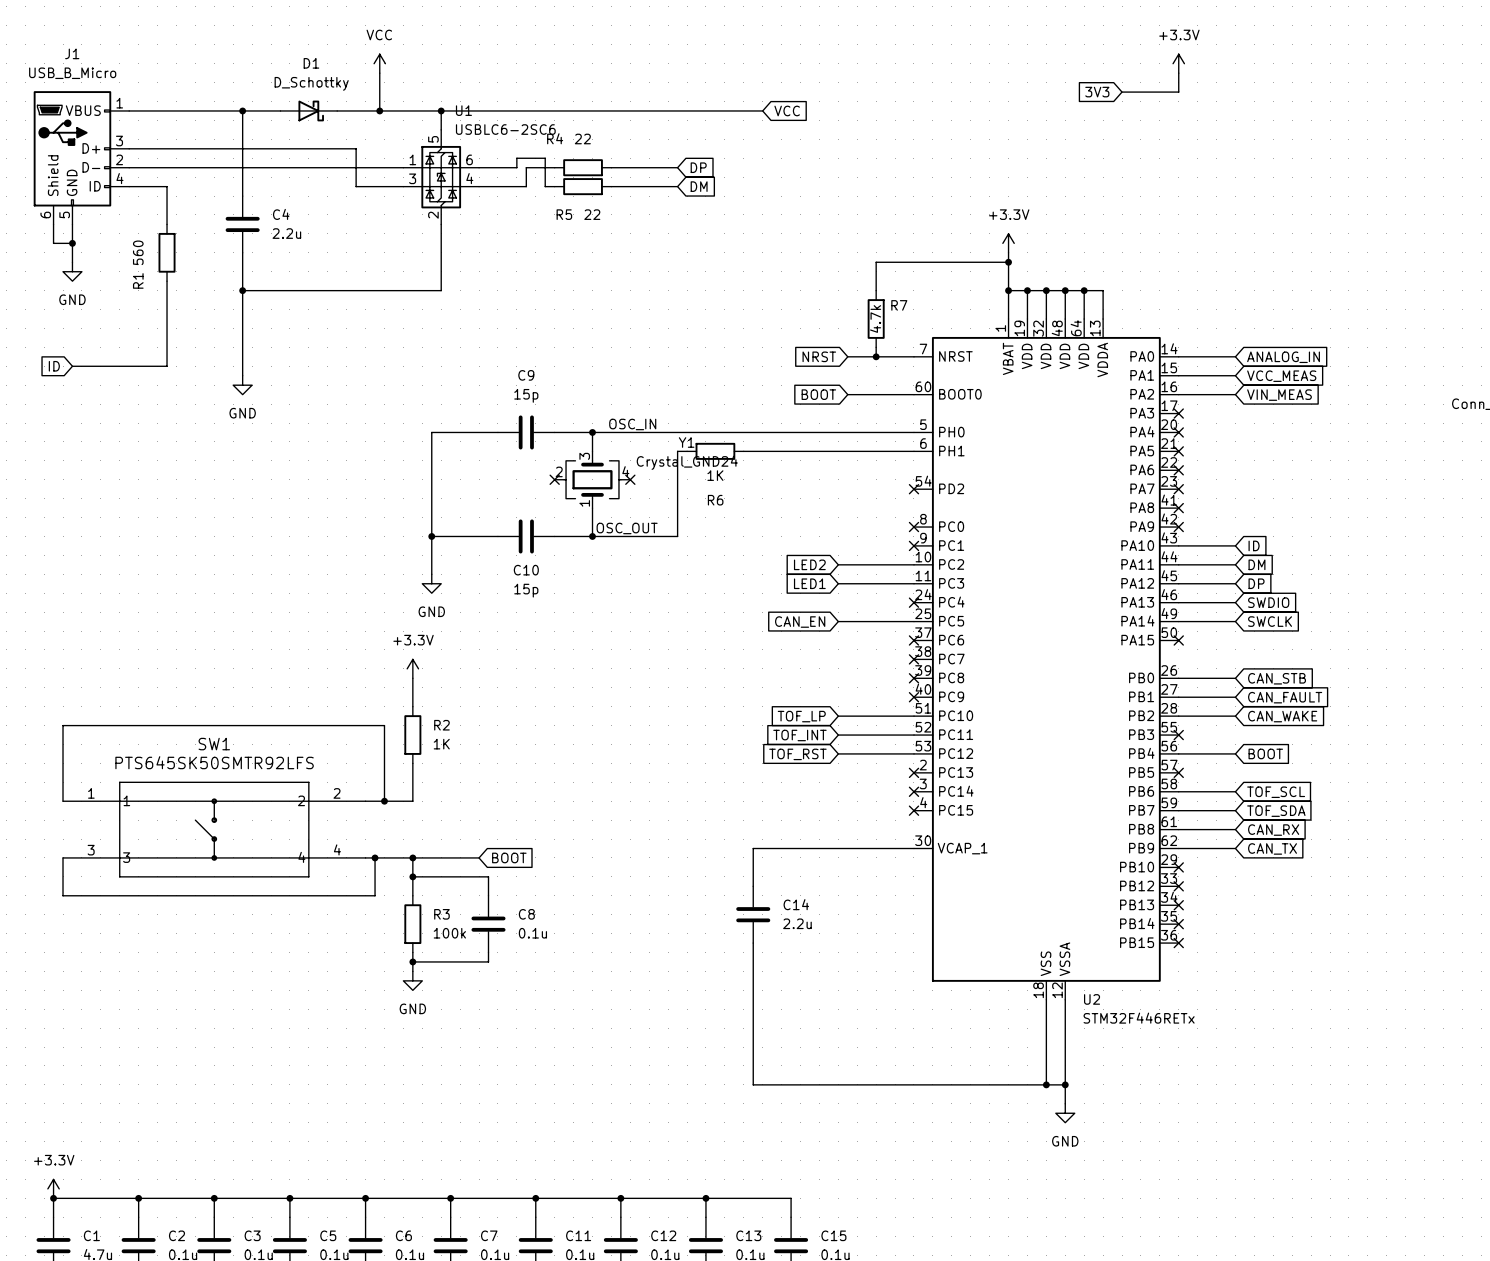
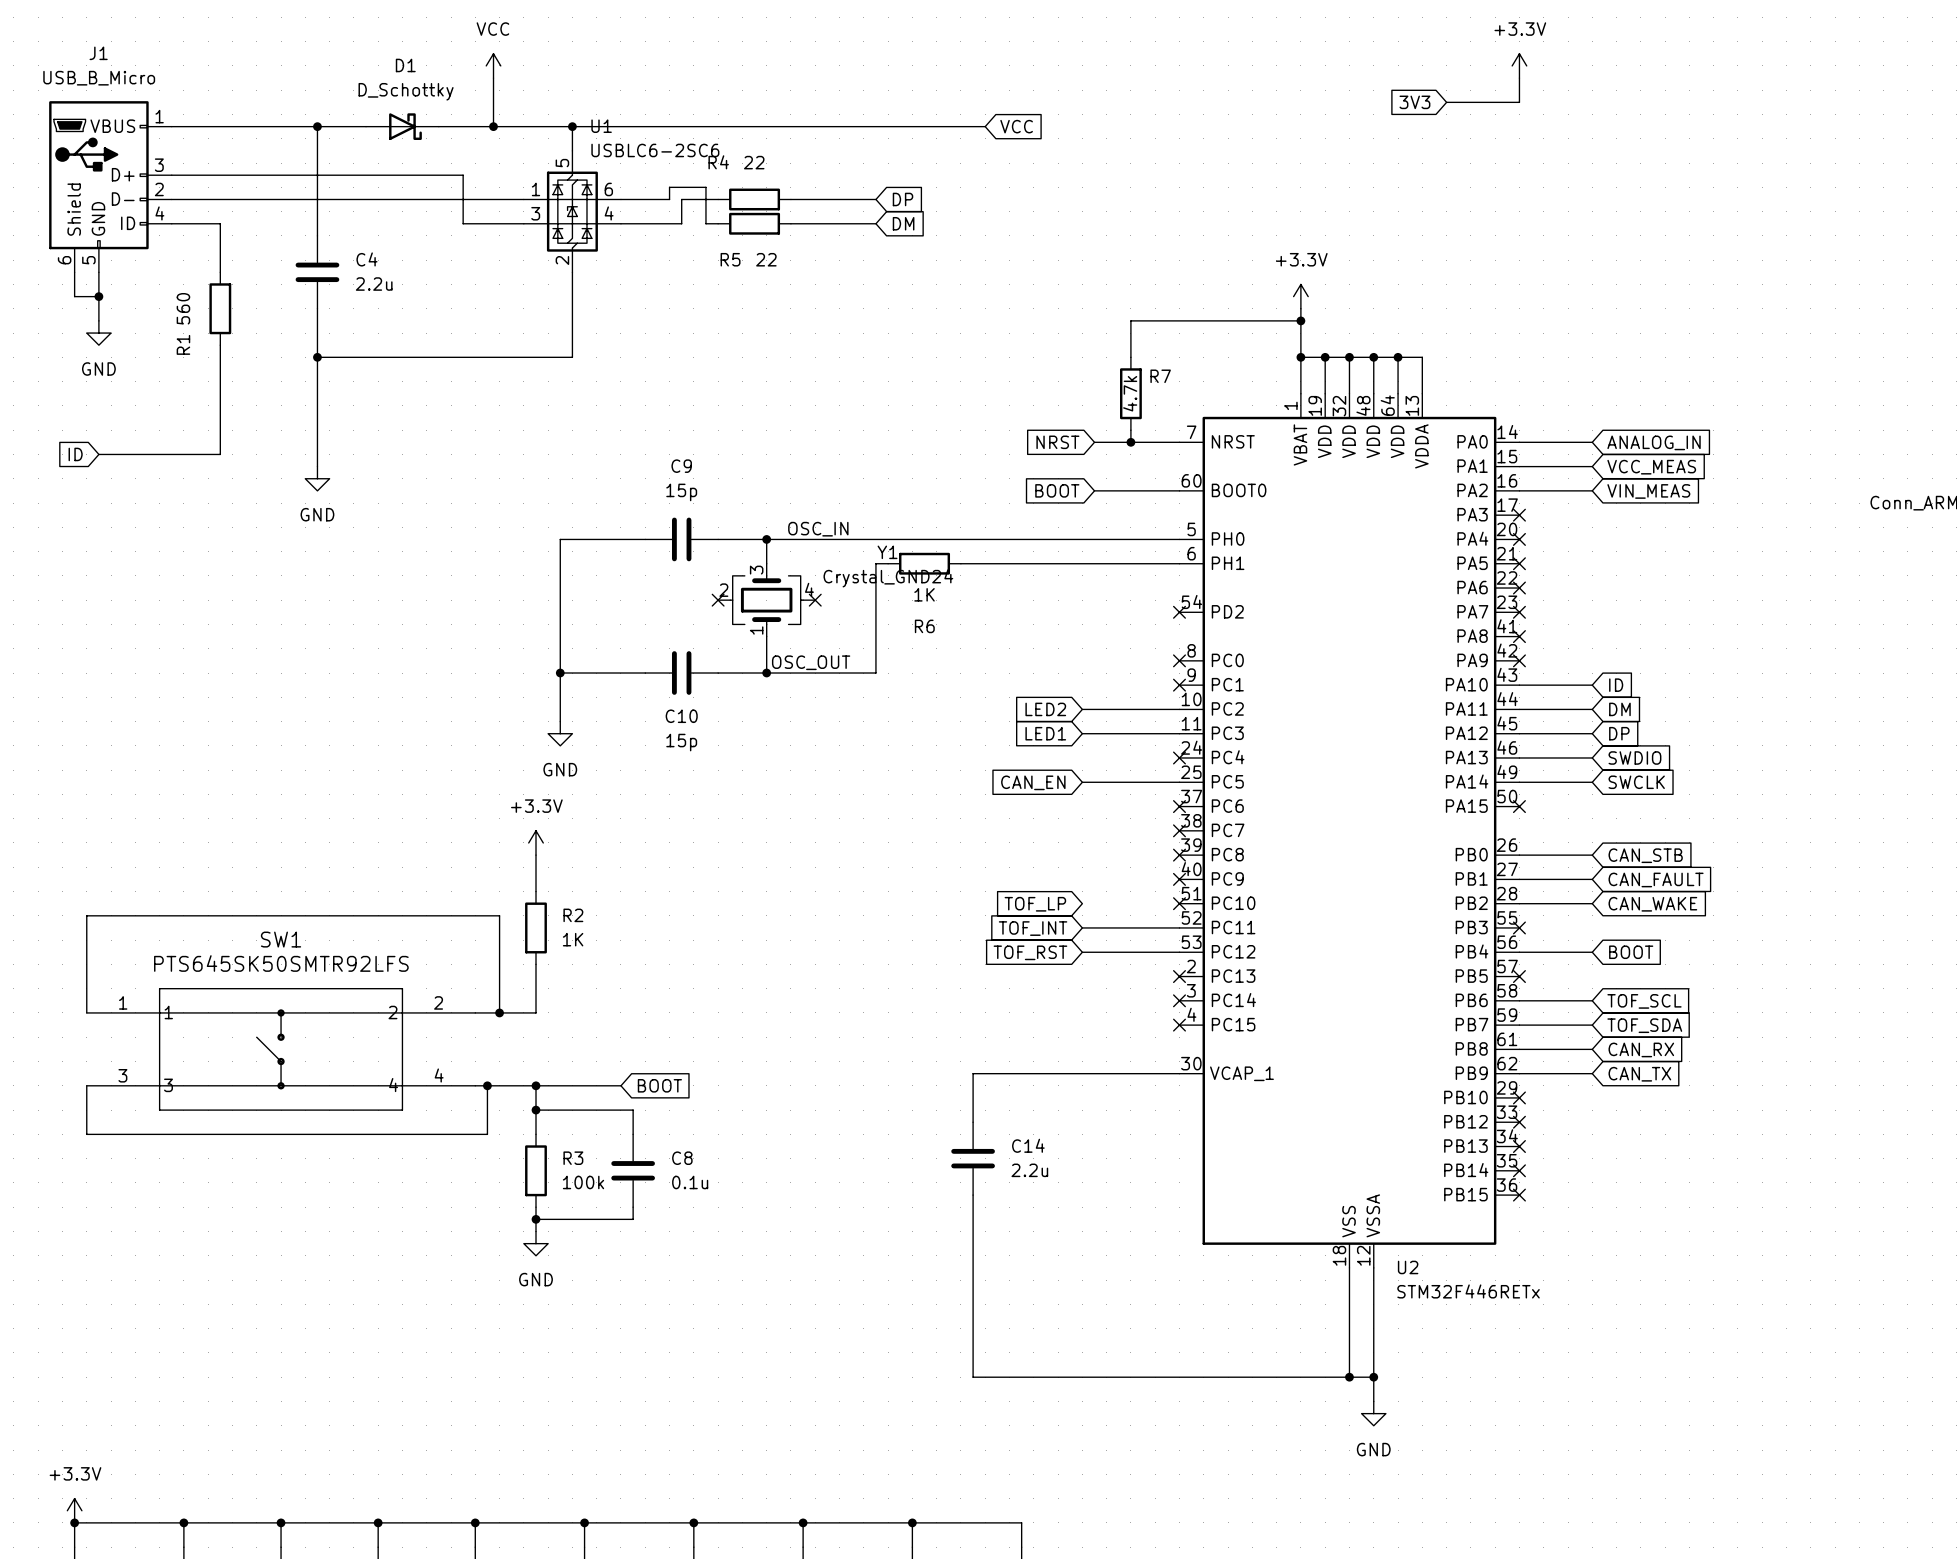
wire: (838, 716) (913, 716) -> none
no-connect mark: none -> (1179, 903)

